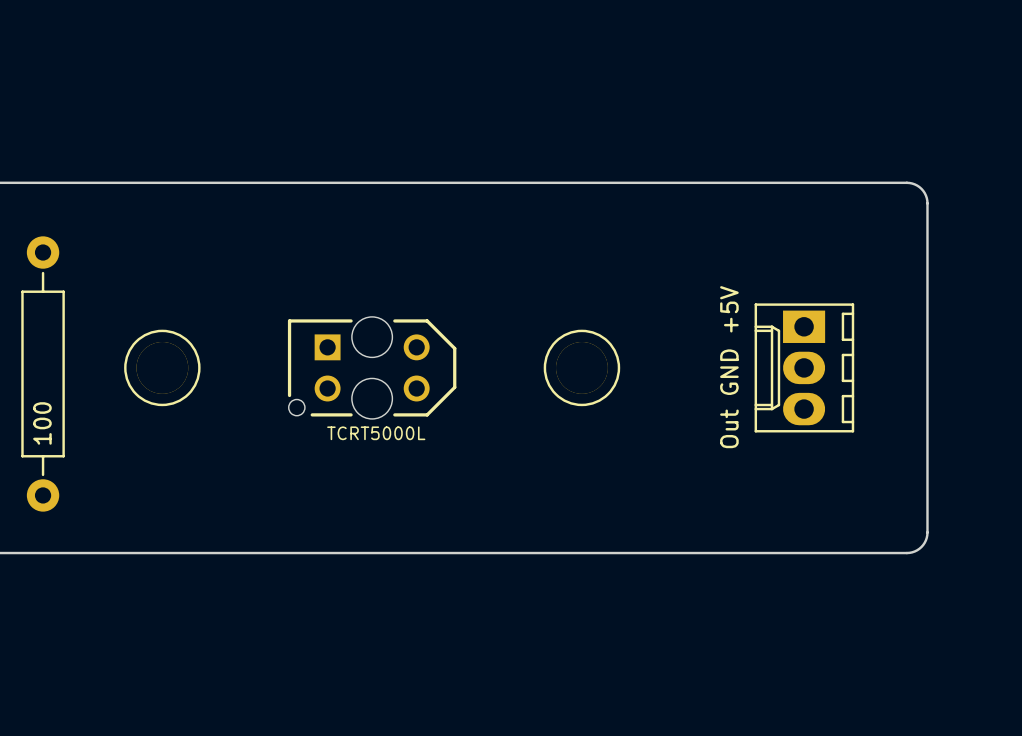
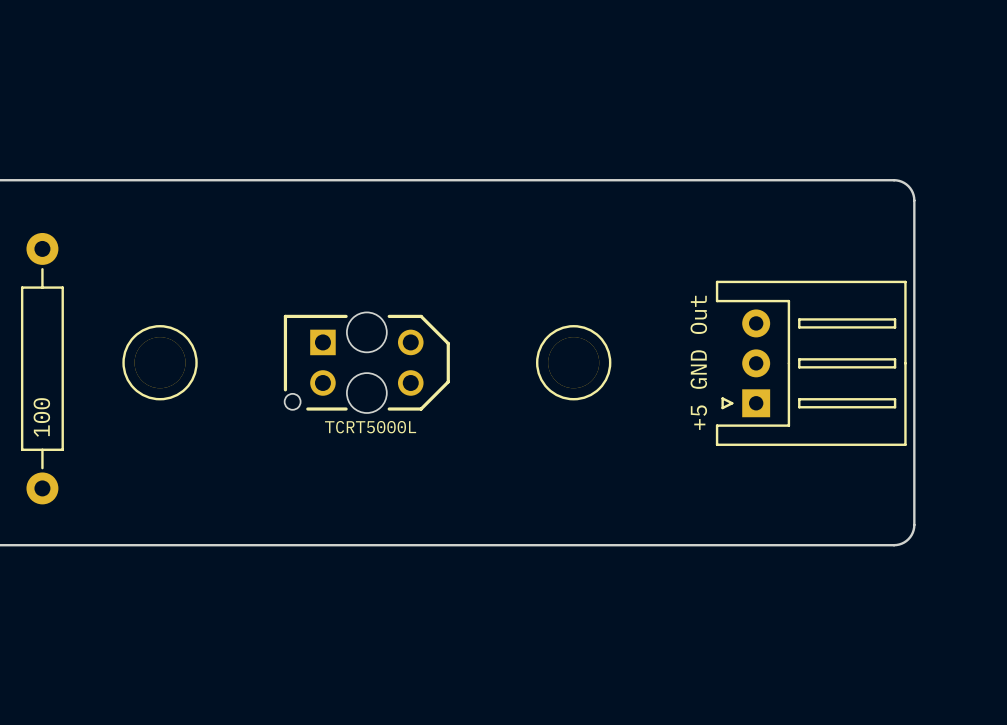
text: none -> +5 GND Out (698, 362)
text: Out GND +5V (729, 367) -> none
part: (804, 367) -> none
part: none -> (811, 363)

